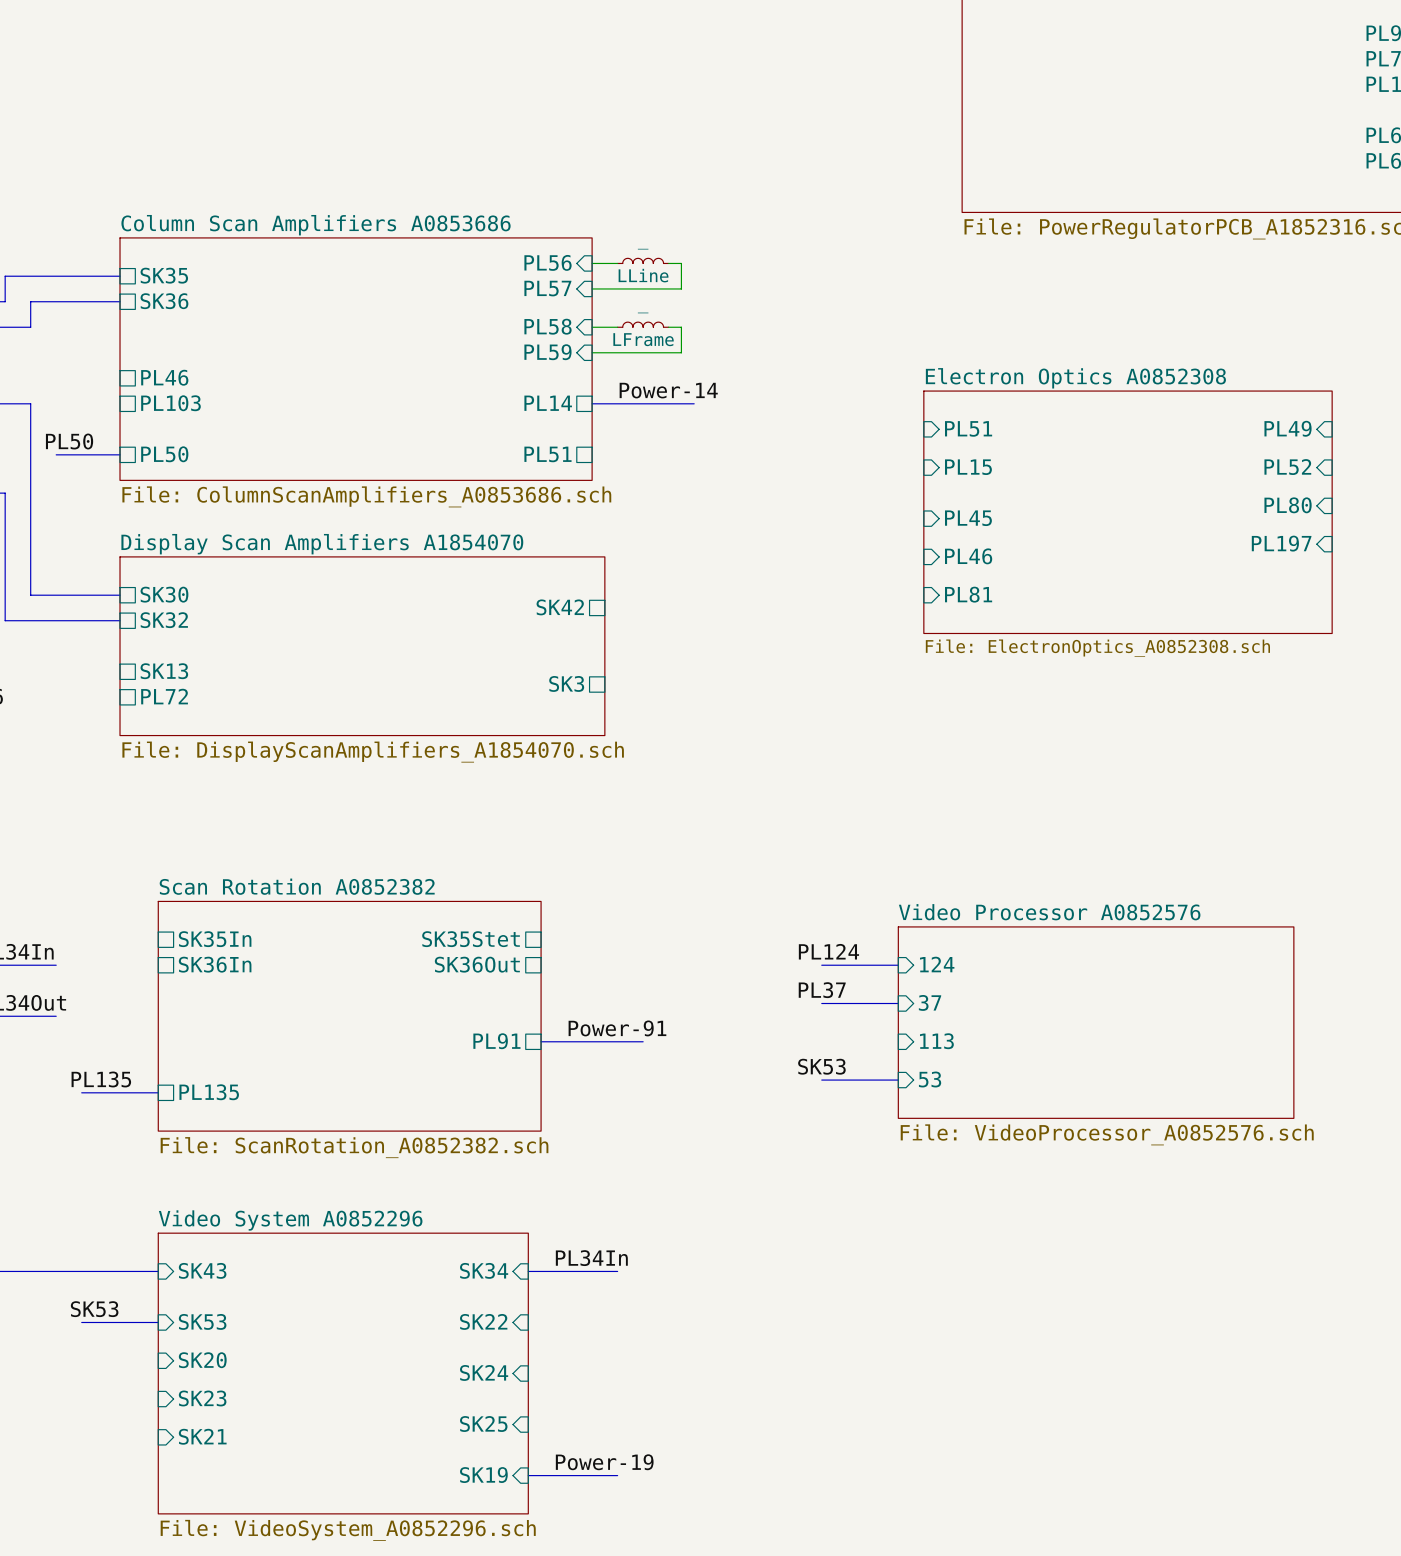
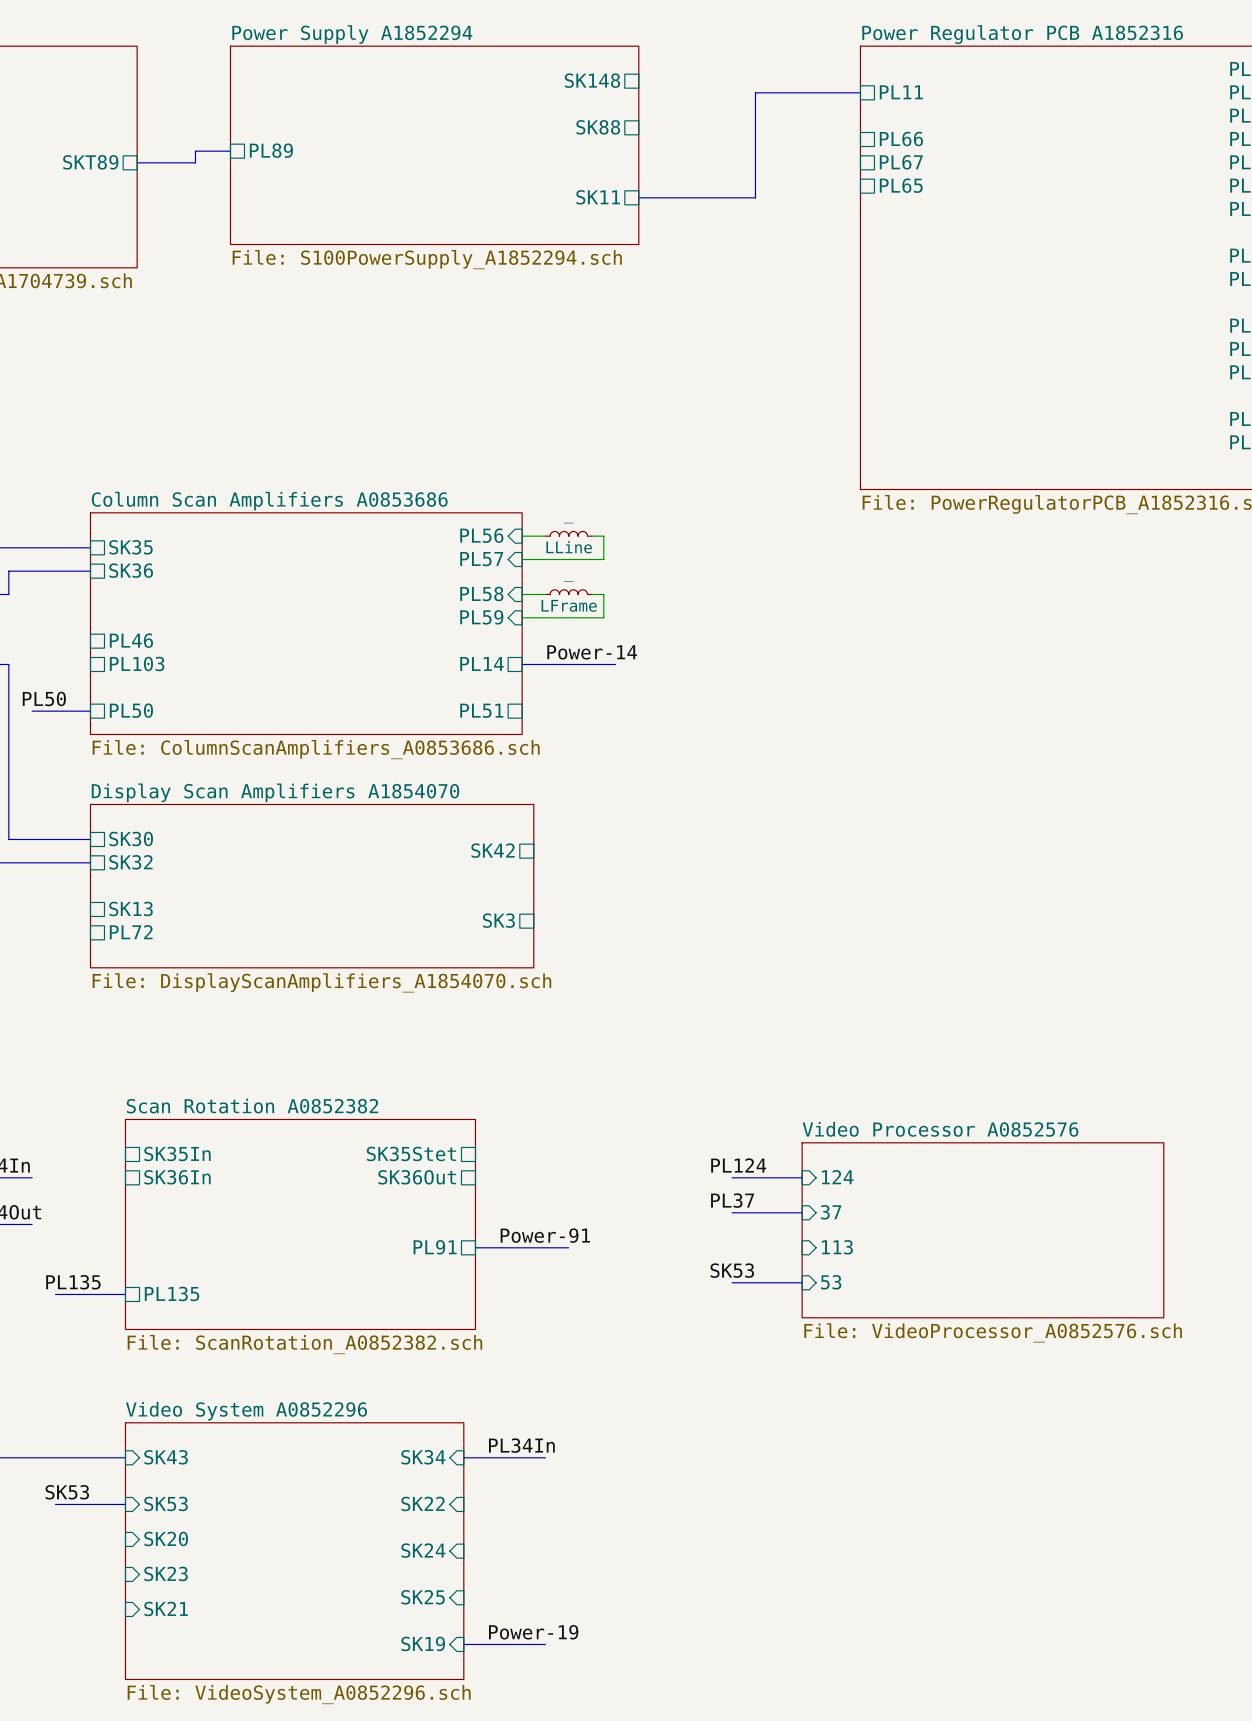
sheet pin: PL51 (968, 428) -> none
sheet pin: PL49 (1288, 428) -> none
sheet pin: PL15 (968, 467) -> none
sheet pin: PL52 (1287, 467) -> none
sheet pin: PL80 (1288, 505) -> none
sheet Electron Optics A0852308: File: ElectronOptics_A0852308.sch (1127, 512) -> none
sheet pin: PL45 (968, 518) -> none
sheet pin: PL197 (1281, 543) -> none
sheet pin: PL46 (968, 556) -> none
sheet pin: PL81 (968, 594) -> none

